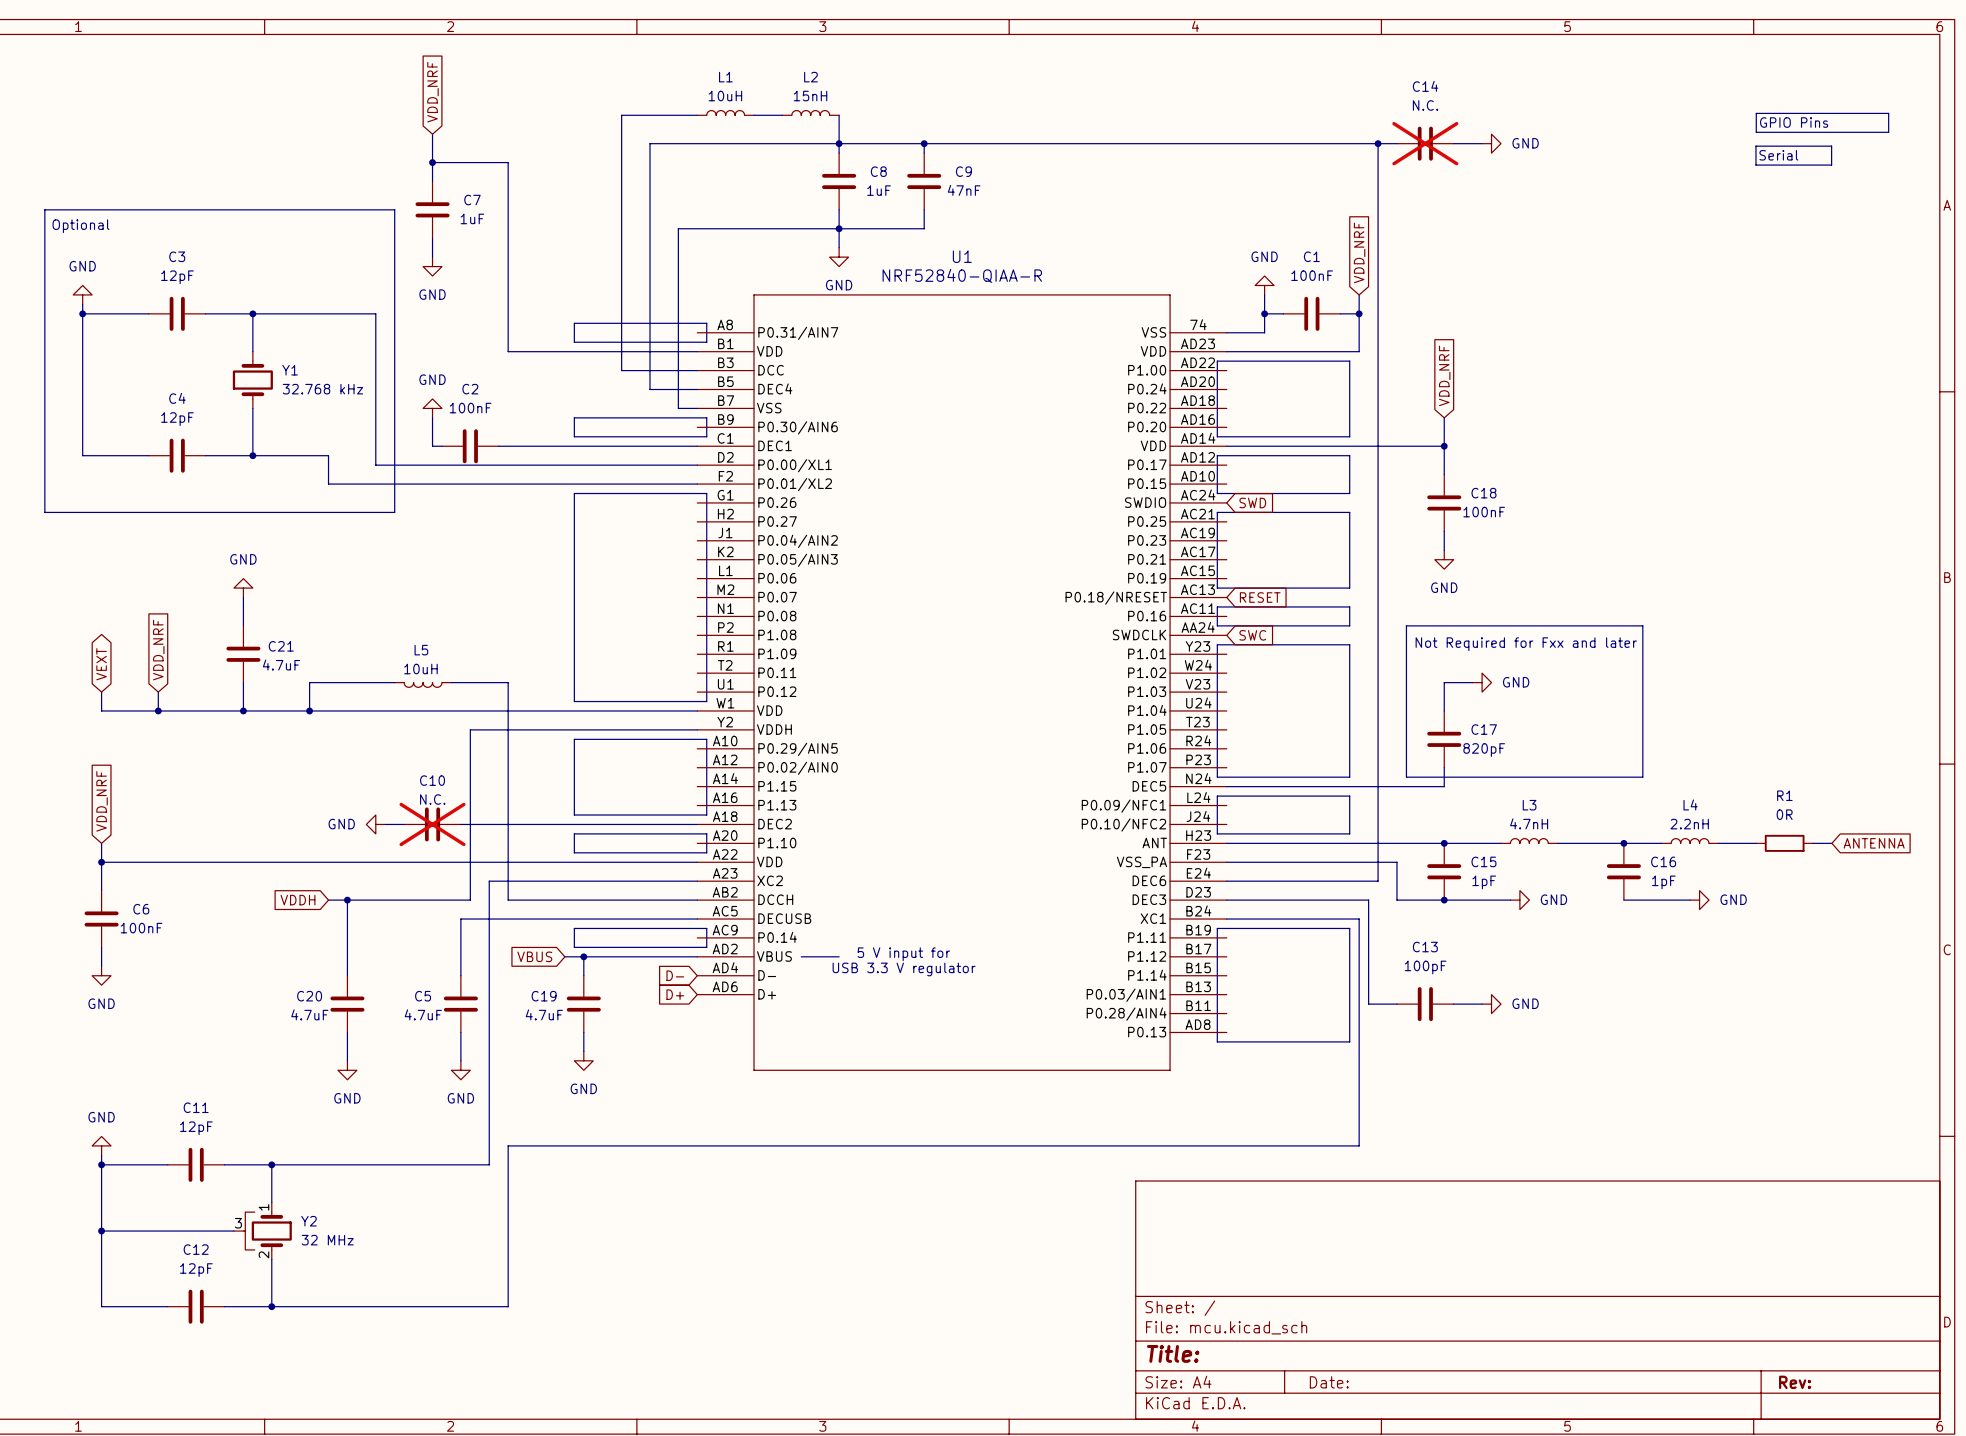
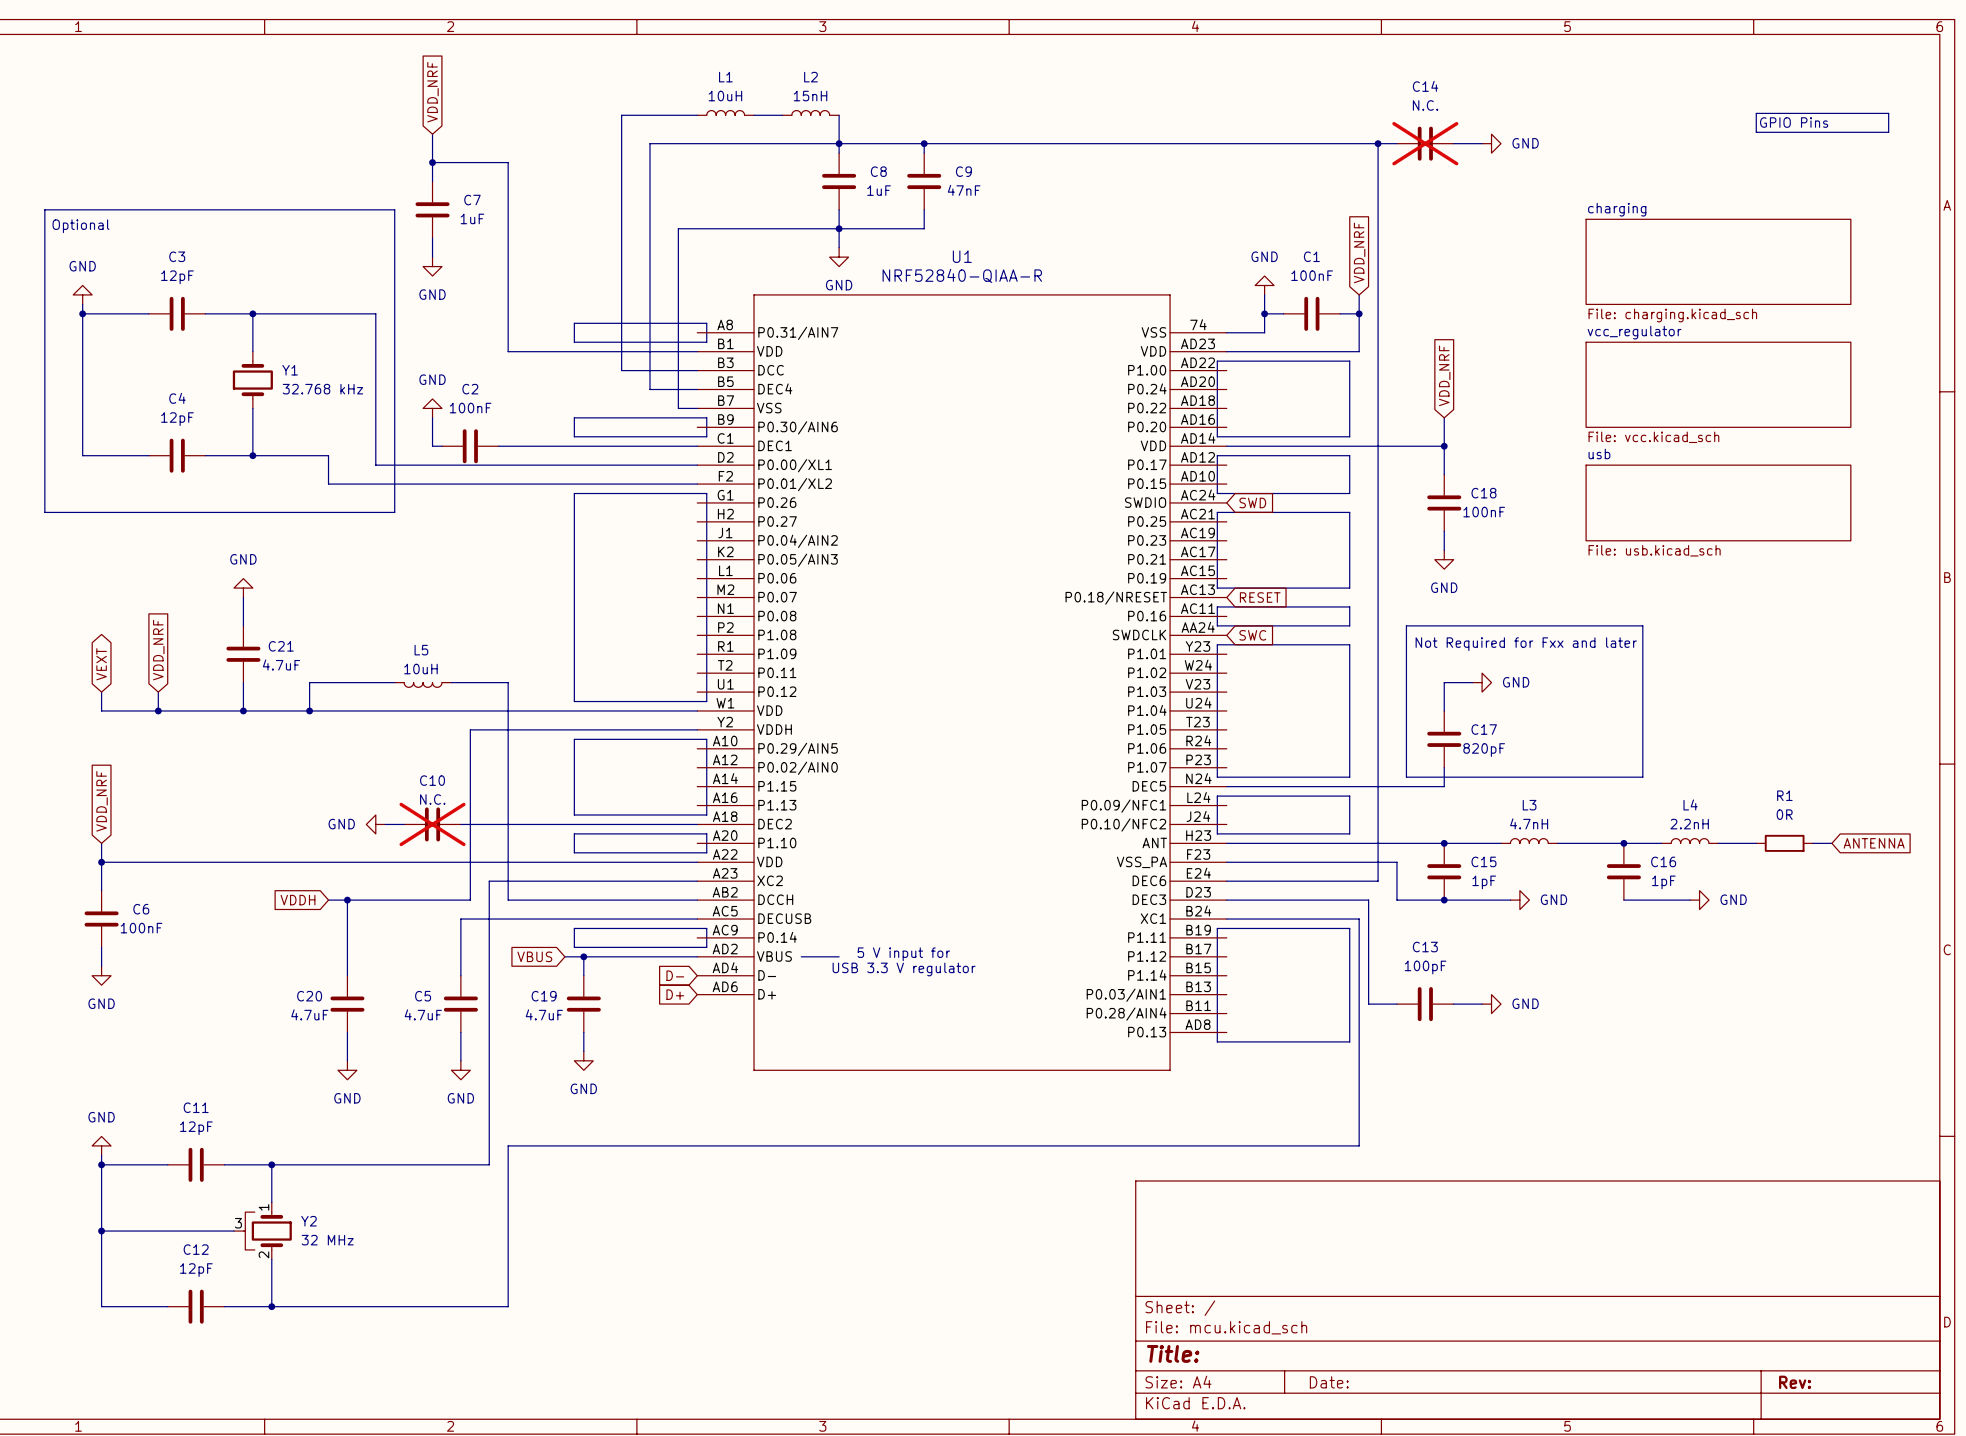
line: (1755, 146) (1831, 146) (1831, 165) (1755, 165) (1755, 146) -> none
text: Serial (1778, 155) -> none
sheet charging: none -> File: charging.kicad_sch (1718, 261)
sheet vcc_regulator: none -> File: vcc.kicad_sch (1718, 384)
sheet usb: none -> File: usb.kicad_sch (1718, 502)

